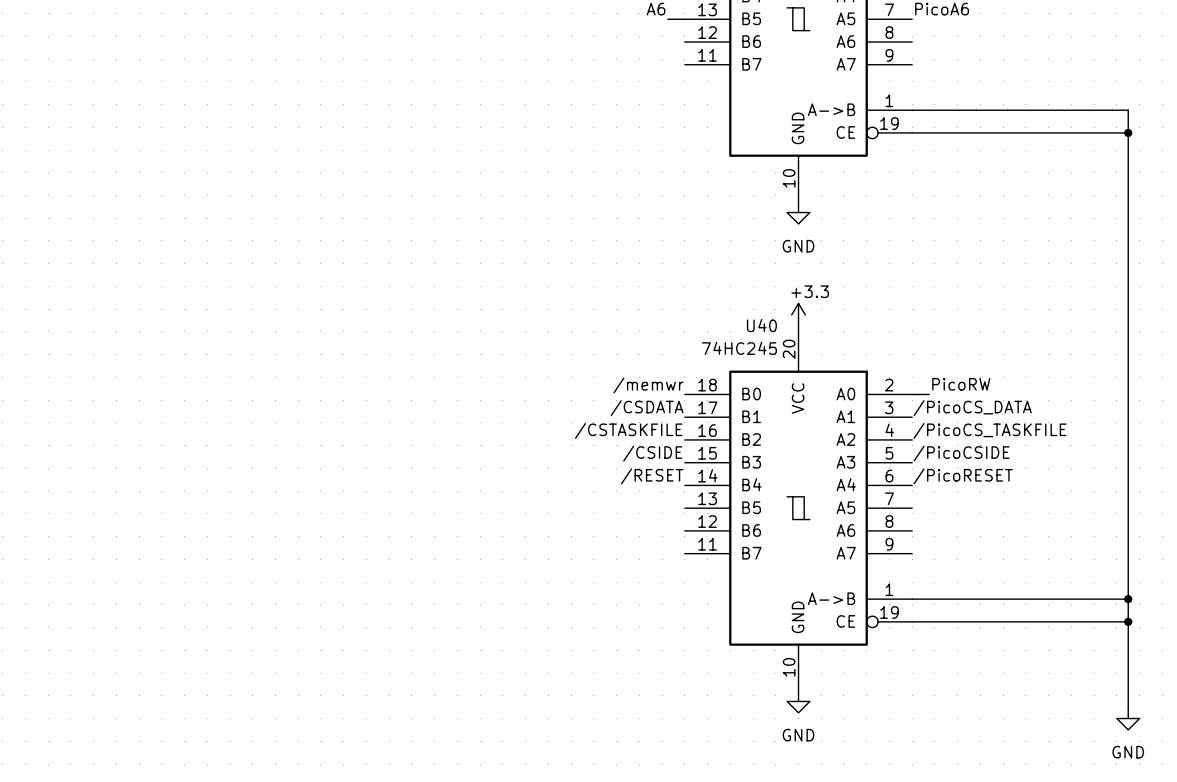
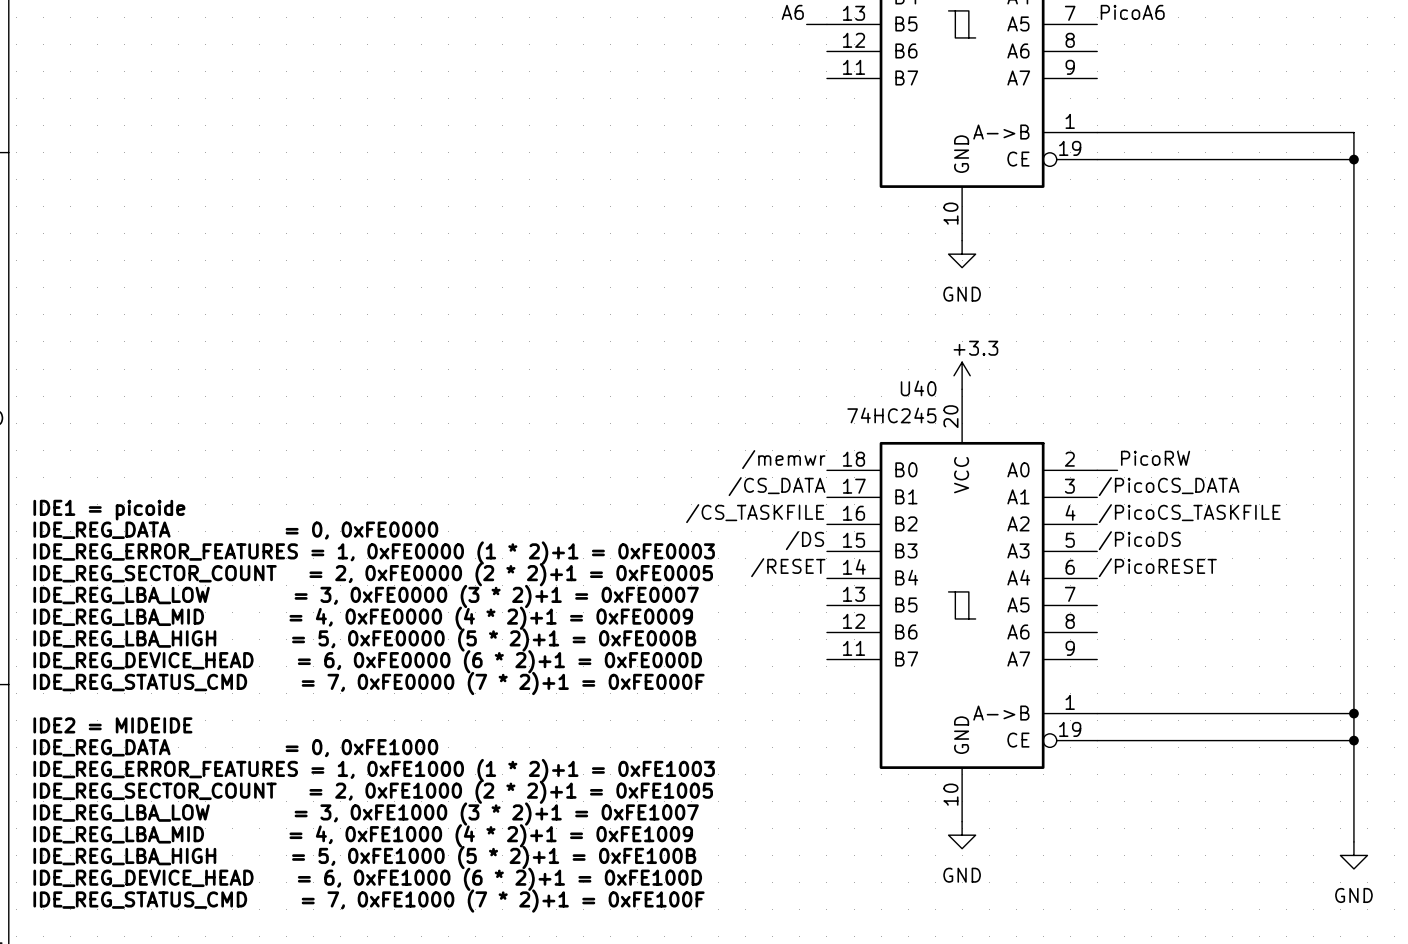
label: /CSDATA (647, 408) -> /CS_DATA (777, 486)
text: none -> IDE1 = picoide (109, 510)
label: /CSTASKFILE (628, 430) -> /CS_TASKFILE (755, 513)
text: none -> IDE_REG_DATA = 0, 0xFE0000 (235, 530)
label: /CSIDE (652, 453) -> /DS (804, 540)
label: /PicoCSIDE (961, 453) -> /PicoDS (1139, 540)
text: none -> IDE_REG_ERROR_FEATURES = 1, 0xFE0000 (1 * 2)+1 = 0xFE0003 (374, 552)
text: none -> IDE_REG_SECTOR_COUNT = 2, 0xFE0000 (2 * 2)+1 = 0xFE0005 (373, 574)
text: none -> IDE_REG_LBA_LOW = 3, 0xFE0000 (3 * 2)+1 = 0xFE0007 (366, 596)
text: none -> IDE_REG_LBA_MID = 4, 0xFE0000 (4 * 2)+1 = 0xFE0009 (363, 618)
text: none -> IDE_REG_LBA_HIGH = 5, 0xFE0000 (5 * 2)+1 = 0xFE000B (364, 639)
text: none -> IDE_REG_DEVICE_HEAD = 6, 0xFE0000 (6 * 2)+1 = 0xFE000D (367, 661)
text: none -> IDE_REG_STATUS_CMD = 7, 0xFE0000 (7 * 2)+1 = 0xFE000F (369, 683)
text: none -> IDE2 = MIDEIDE (112, 725)
text: none -> IDE_REG_DATA = 0, 0xFE1000 (235, 748)
text: none -> IDE_REG_ERROR_FEATURES = 1, 0xFE1000 (1 * 2)+1 = 0xFE1003 (374, 770)
text: none -> IDE_REG_SECTOR_COUNT = 2, 0xFE1000 (2 * 2)+1 = 0xFE1005 (373, 792)
text: none -> IDE_REG_LBA_LOW = 3, 0xFE1000 (3 * 2)+1 = 0xFE1007 (366, 814)
text: none -> IDE_REG_LBA_MID = 4, 0xFE1000 (4 * 2)+1 = 0xFE1009 (363, 835)
text: none -> IDE_REG_LBA_HIGH = 5, 0xFE1000 (5 * 2)+1 = 0xFE100B (364, 857)
text: none -> IDE_REG_DEVICE_HEAD = 6, 0xFE1000 (6 * 2)+1 = 0xFE100D (367, 879)
text: none -> IDE_REG_STATUS_CMD = 7, 0xFE1000 (7 * 2)+1 = 0xFE100F (369, 901)

